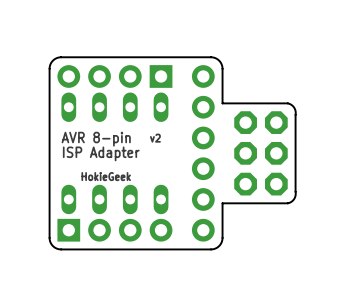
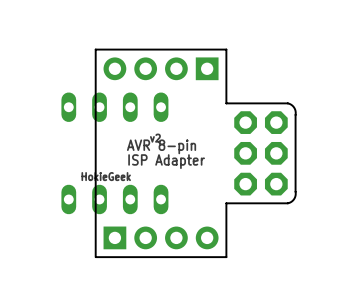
part position: (114, 76) -> (161, 68)
board edge: (226, 103) (222, 103) (222, 65) (219, 60) (213, 57) (61, 57) (54, 59) (49, 65) (49, 237) (54, 247) (61, 249) (213, 249) (219, 246) (222, 240) (222, 203) (226, 203) -> (226, 103) (226, 49) (95, 49) (95, 257)
text position: AVR 8-pin (96, 139) -> AVR 8-pin (161, 146)
text position: ISP Adapter (101, 153) -> ISP Adapter (166, 161)
part: (203, 153) -> none
board edge: none -> (226, 203) (226, 257) (95, 257)
part position: (114, 230) -> (161, 237)

